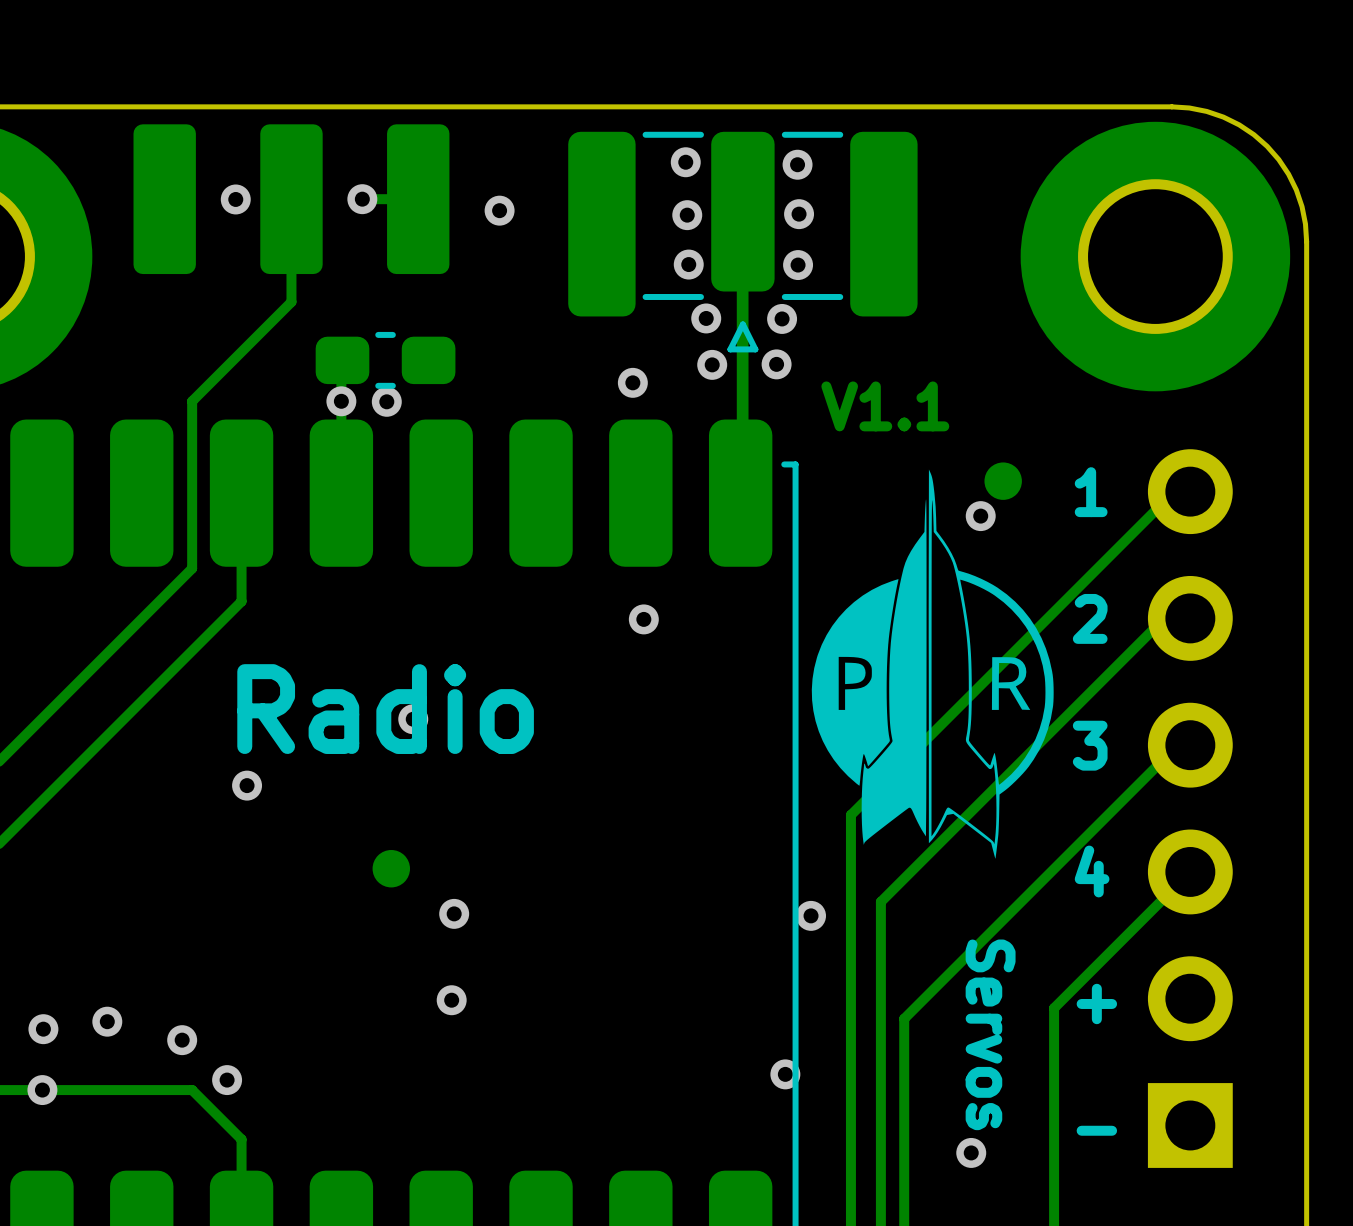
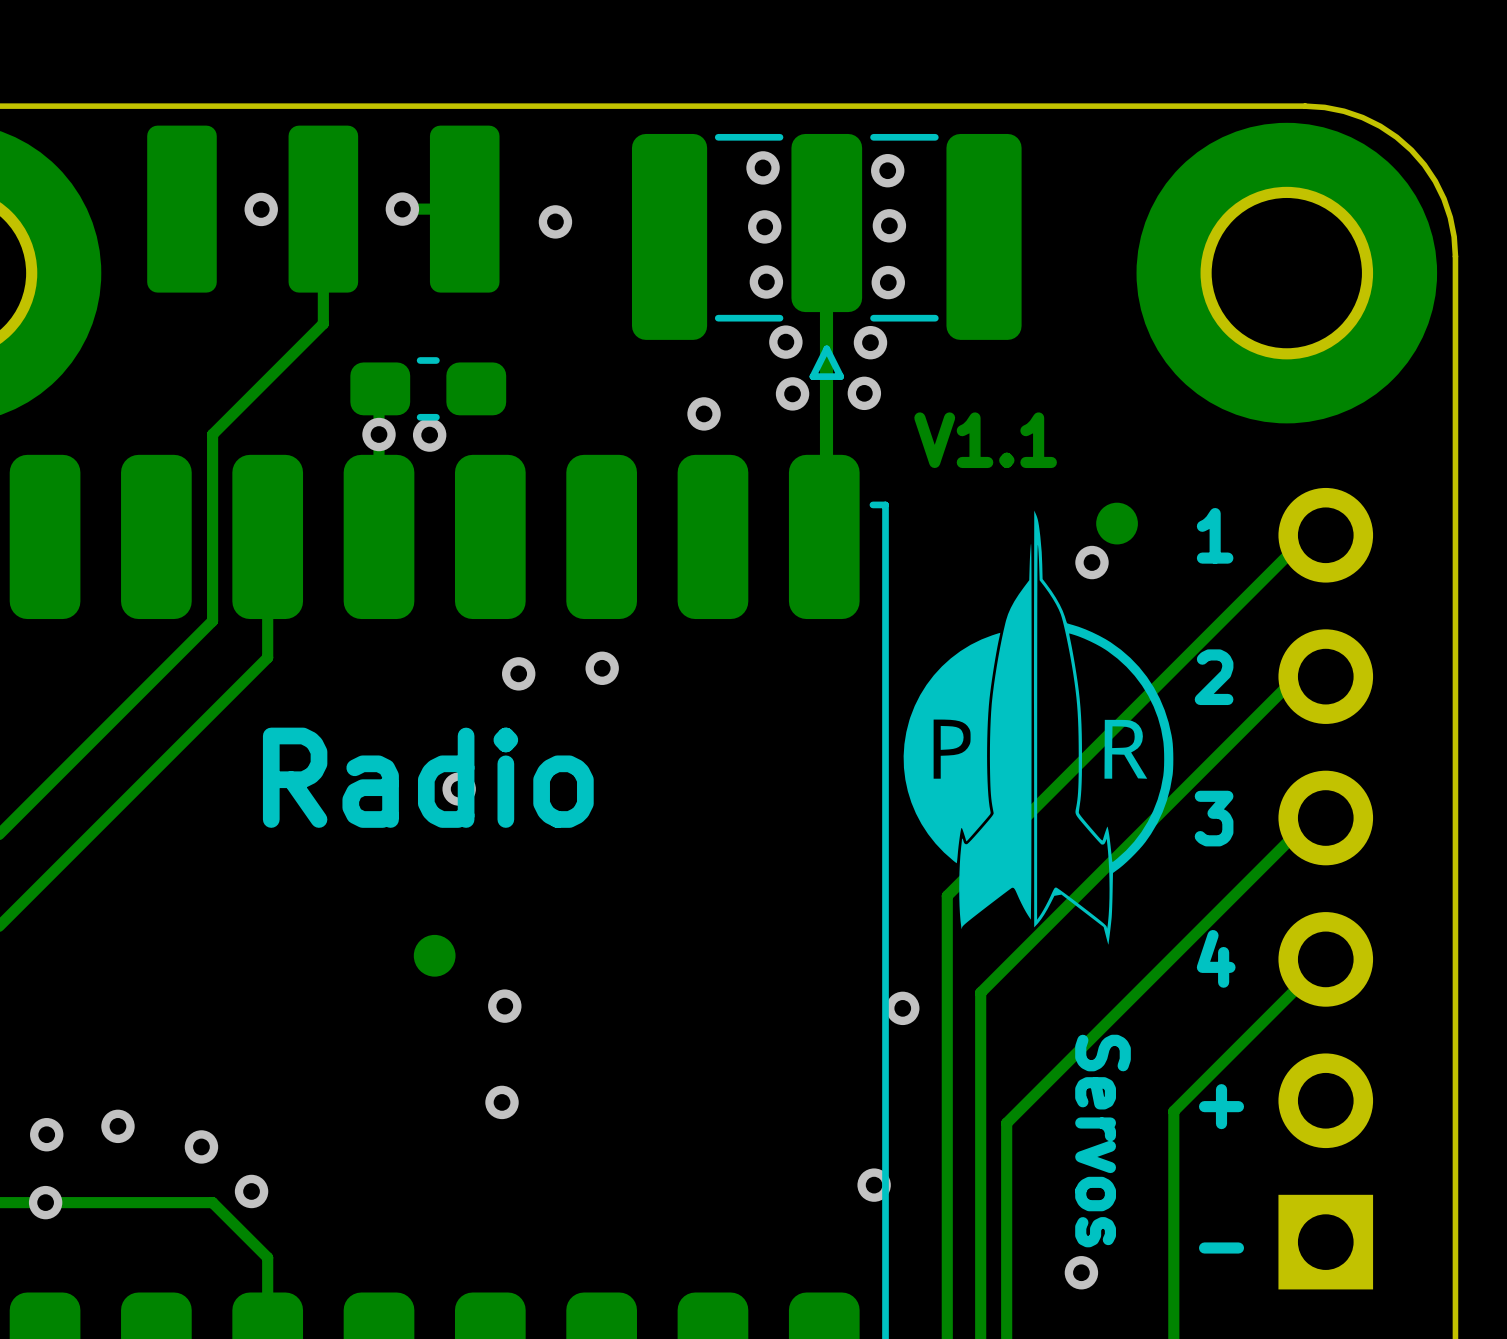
via: none -> (602, 668)
via: none -> (518, 673)
via: (643, 619) -> none
via: (247, 785) -> none

